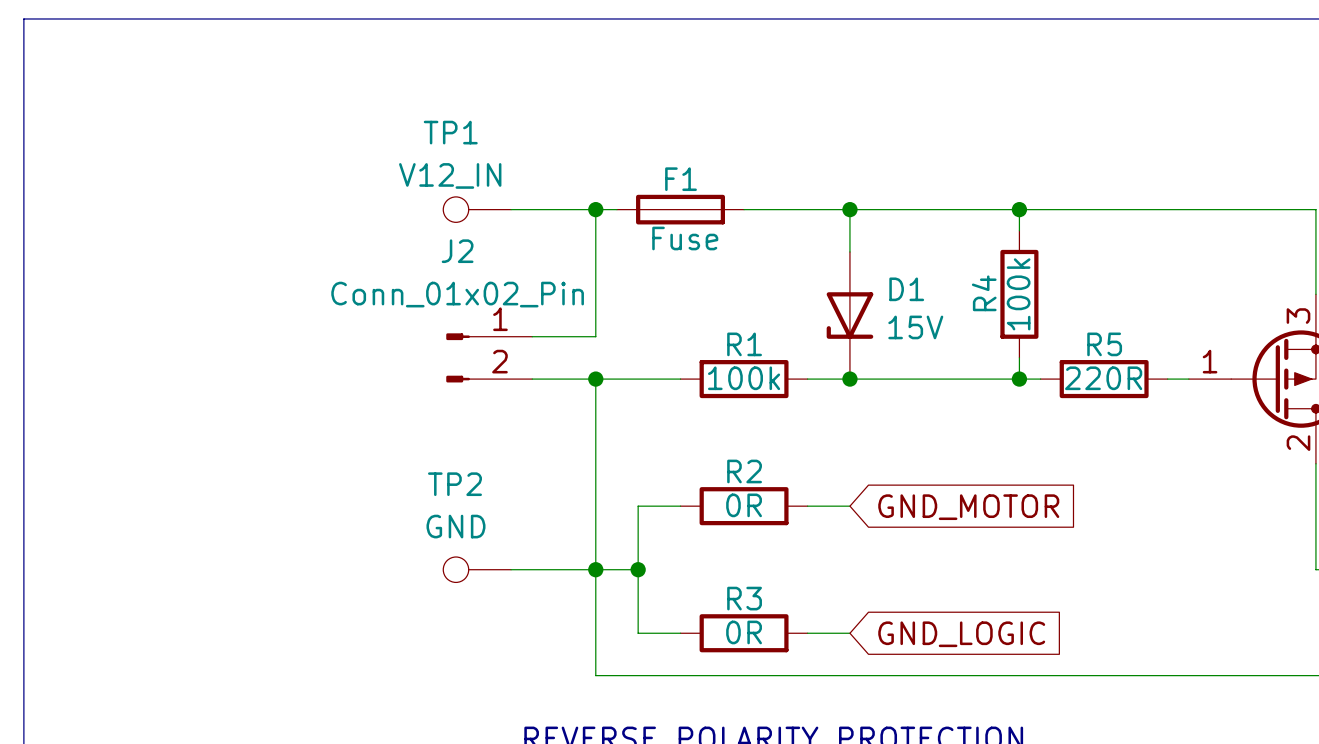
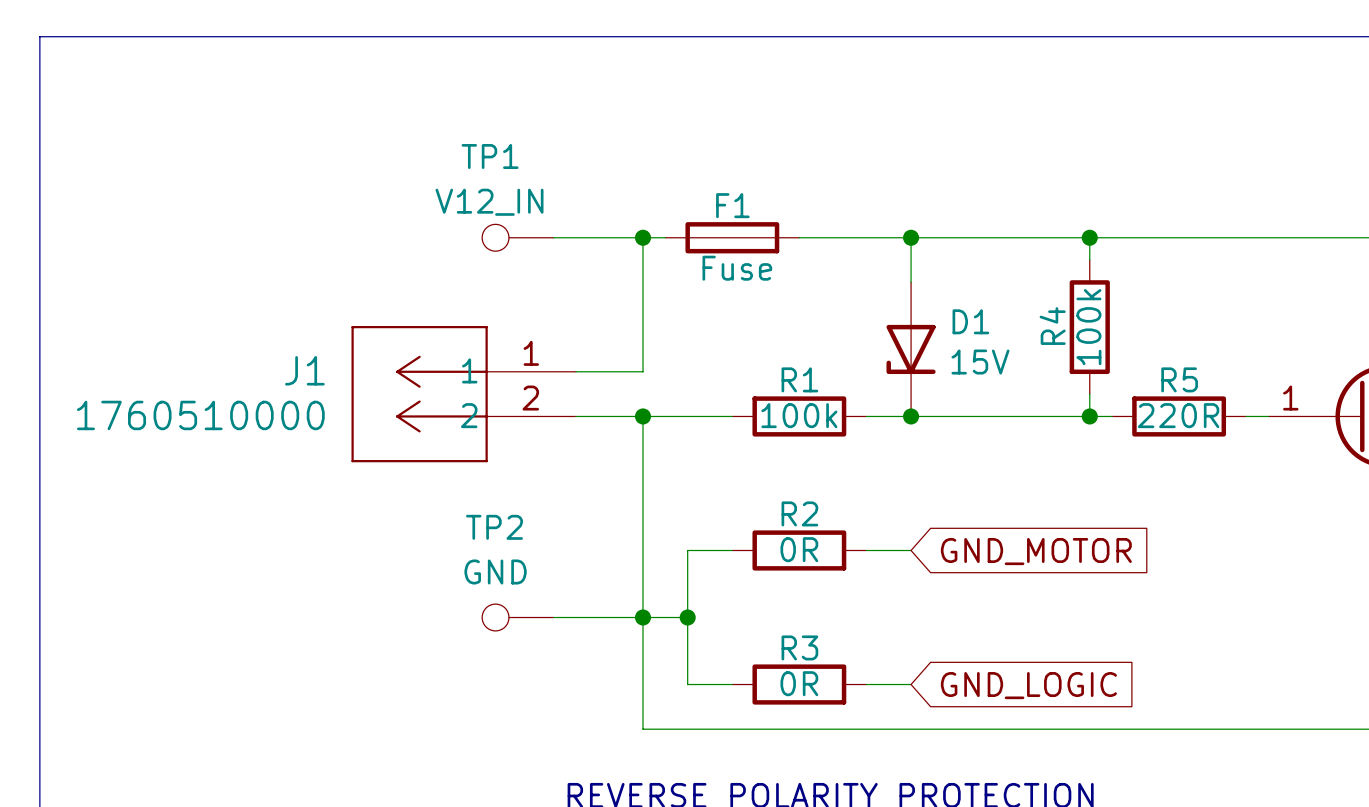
J1: none -> 1760510000 (463, 394)
J2: Conn_01x02_Pin (489, 357) -> none

